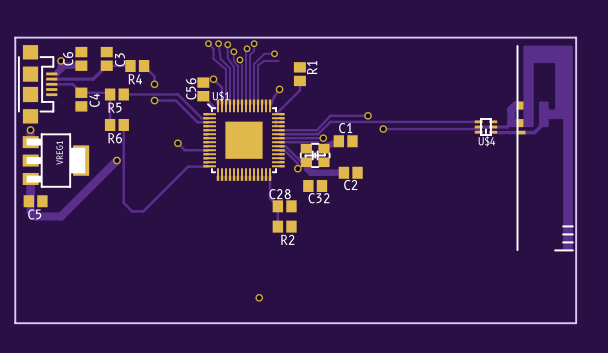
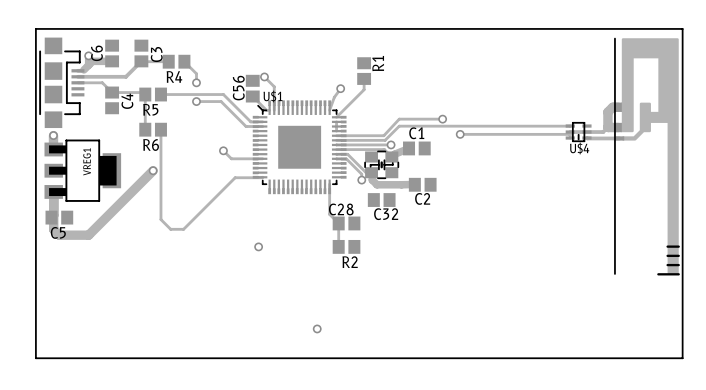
track: (208, 43) (213, 48) (213, 58) (225, 69) (225, 108) -> none
via: (208, 43) -> none
track: (218, 43) (220, 58) (229, 68) (229, 108) -> none
via: (218, 43) -> none
track: (254, 43) (254, 50) (250, 54) (250, 108) -> none
via: (254, 43) -> none
track: (227, 44) (227, 57) (233, 67) (233, 108) -> none
via: (227, 44) -> none
track: (247, 48) (246, 108) -> none
via: (247, 48) -> none
track: (233, 51) (233, 60) (237, 66) (237, 108) -> none
via: (233, 51) -> none
track: (274, 53) (264, 53) (254, 64) (254, 108) -> none
via: (274, 53) -> none
track: (239, 59) (242, 65) (242, 108) -> none
via: (239, 59) -> none
track: (278, 60) (264, 60) (258, 65) (258, 108) -> none
via: none -> (258, 246)

